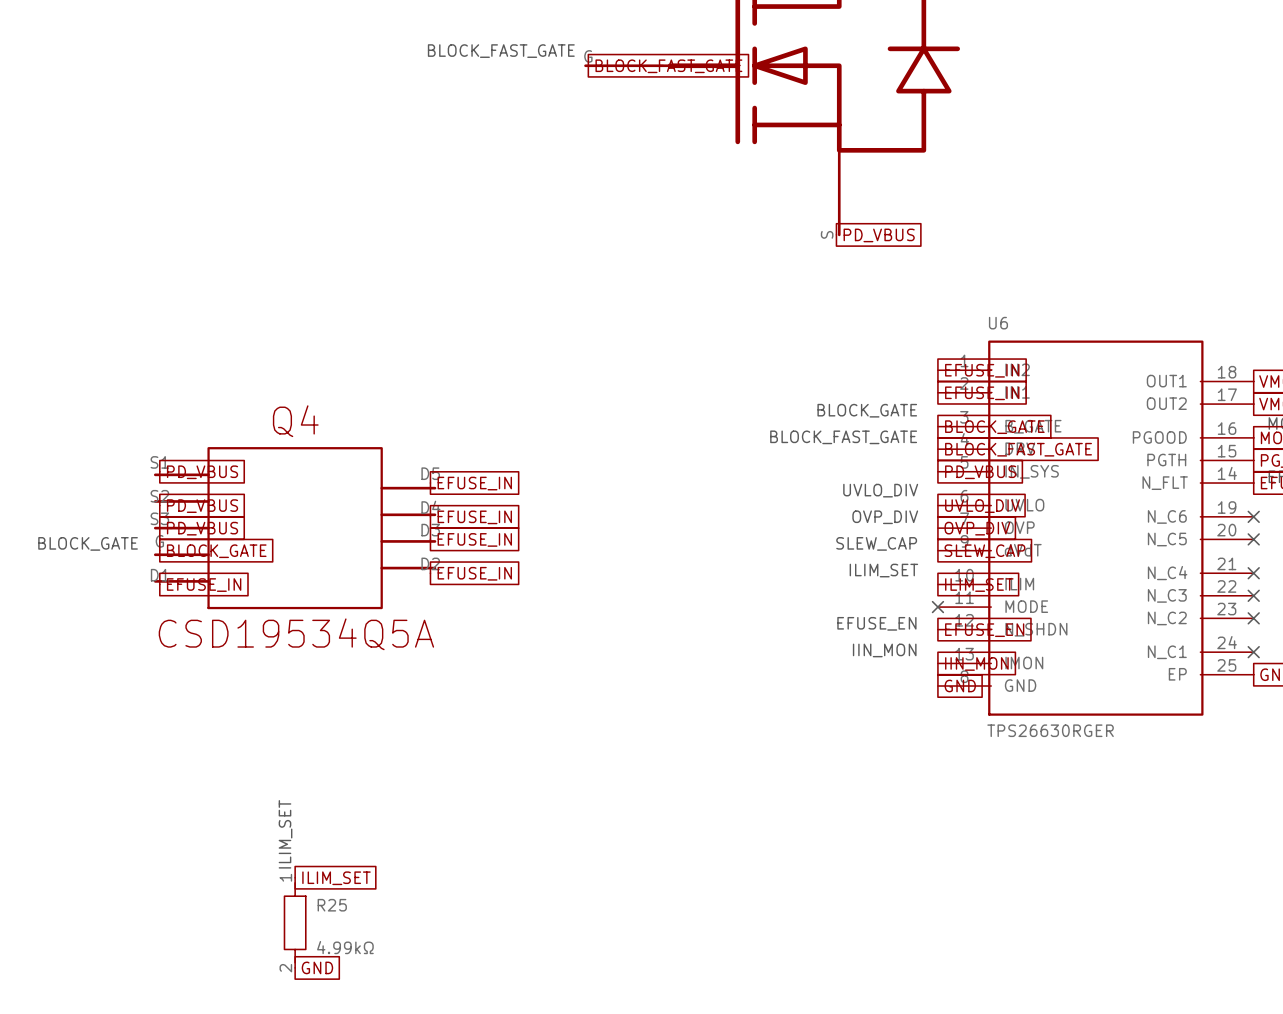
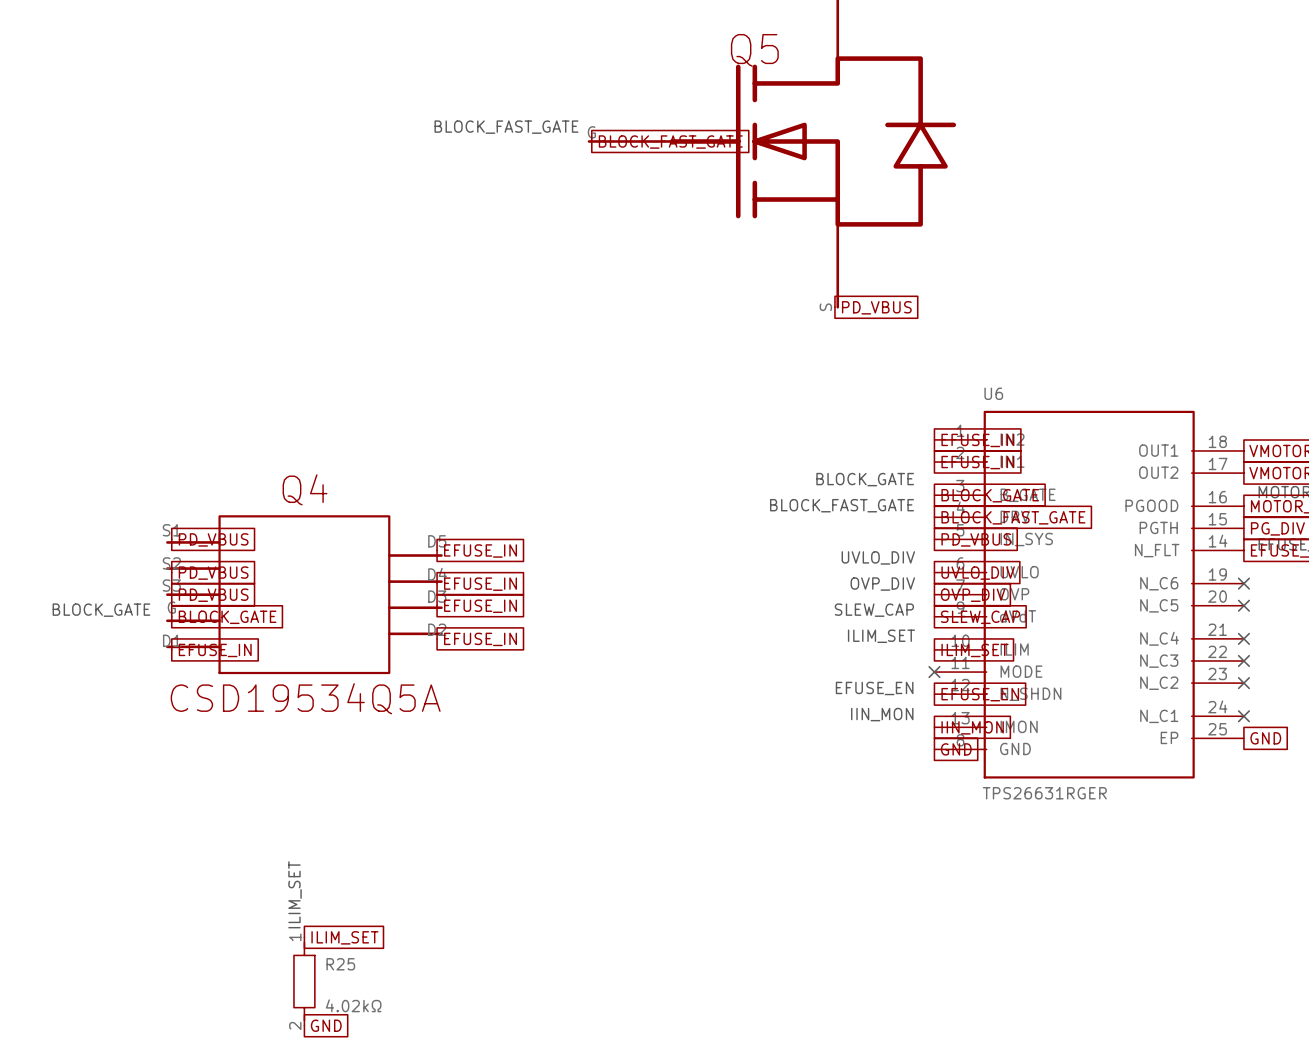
U6 value: TPS26630RGER (1050, 730) -> TPS26631RGER (1044, 793)
R25 value: 4.99kΩ (345, 947) -> 4.02kΩ (353, 1005)

